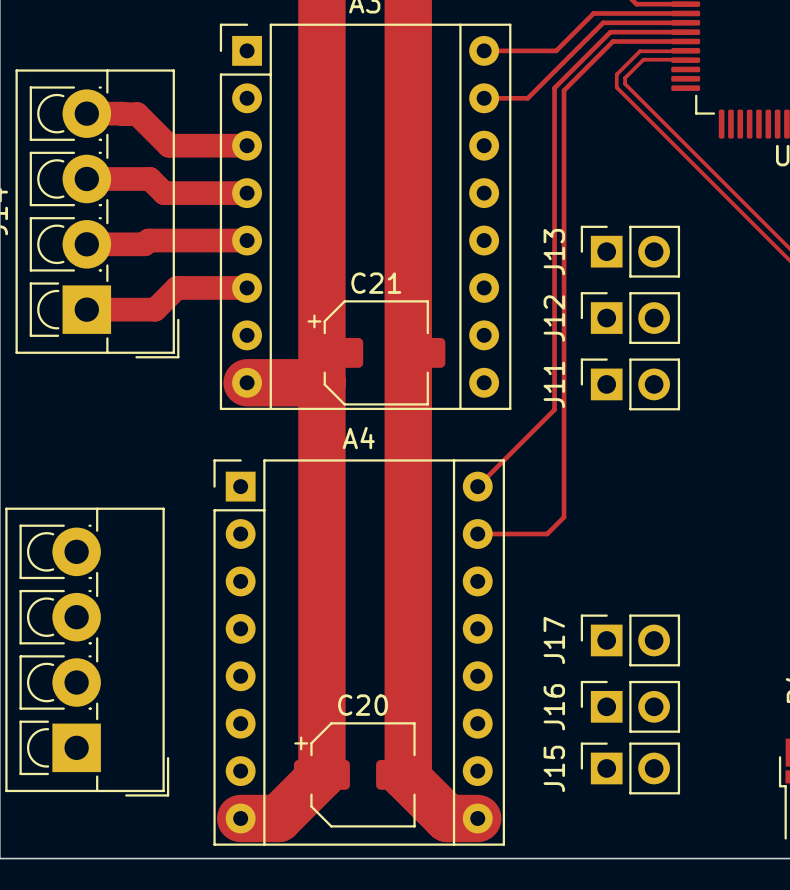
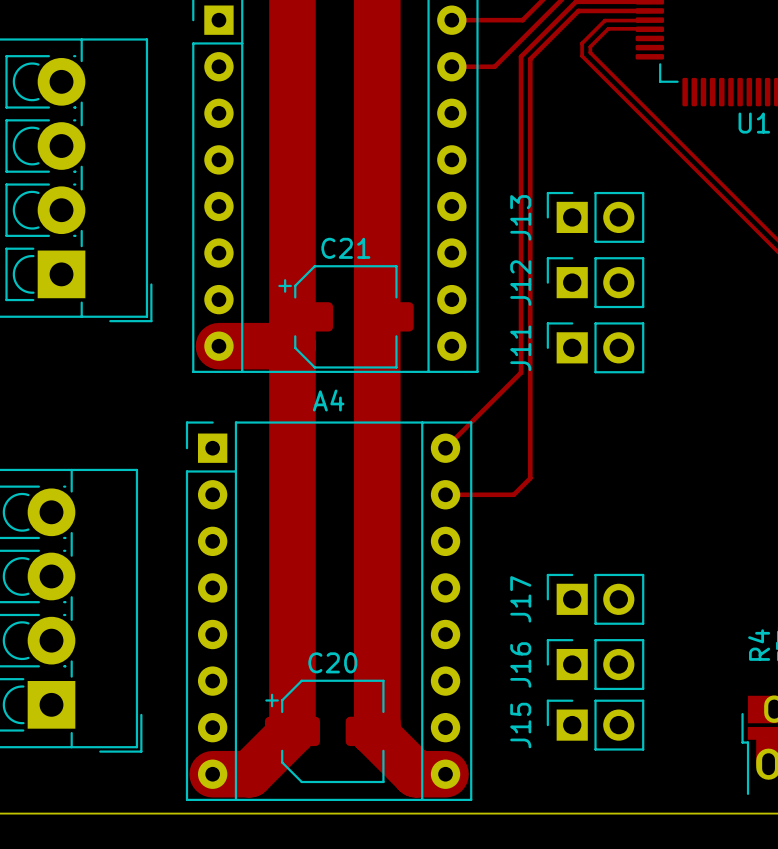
track: (86, 113) (137, 114) (168, 145) (247, 145) -> none
track: (86, 178) (149, 178) (164, 193) (247, 193) -> none
track: (247, 240) (148, 240) (144, 244) (86, 244) -> none
track: (247, 287) (176, 287) (155, 309) (86, 309) -> none

